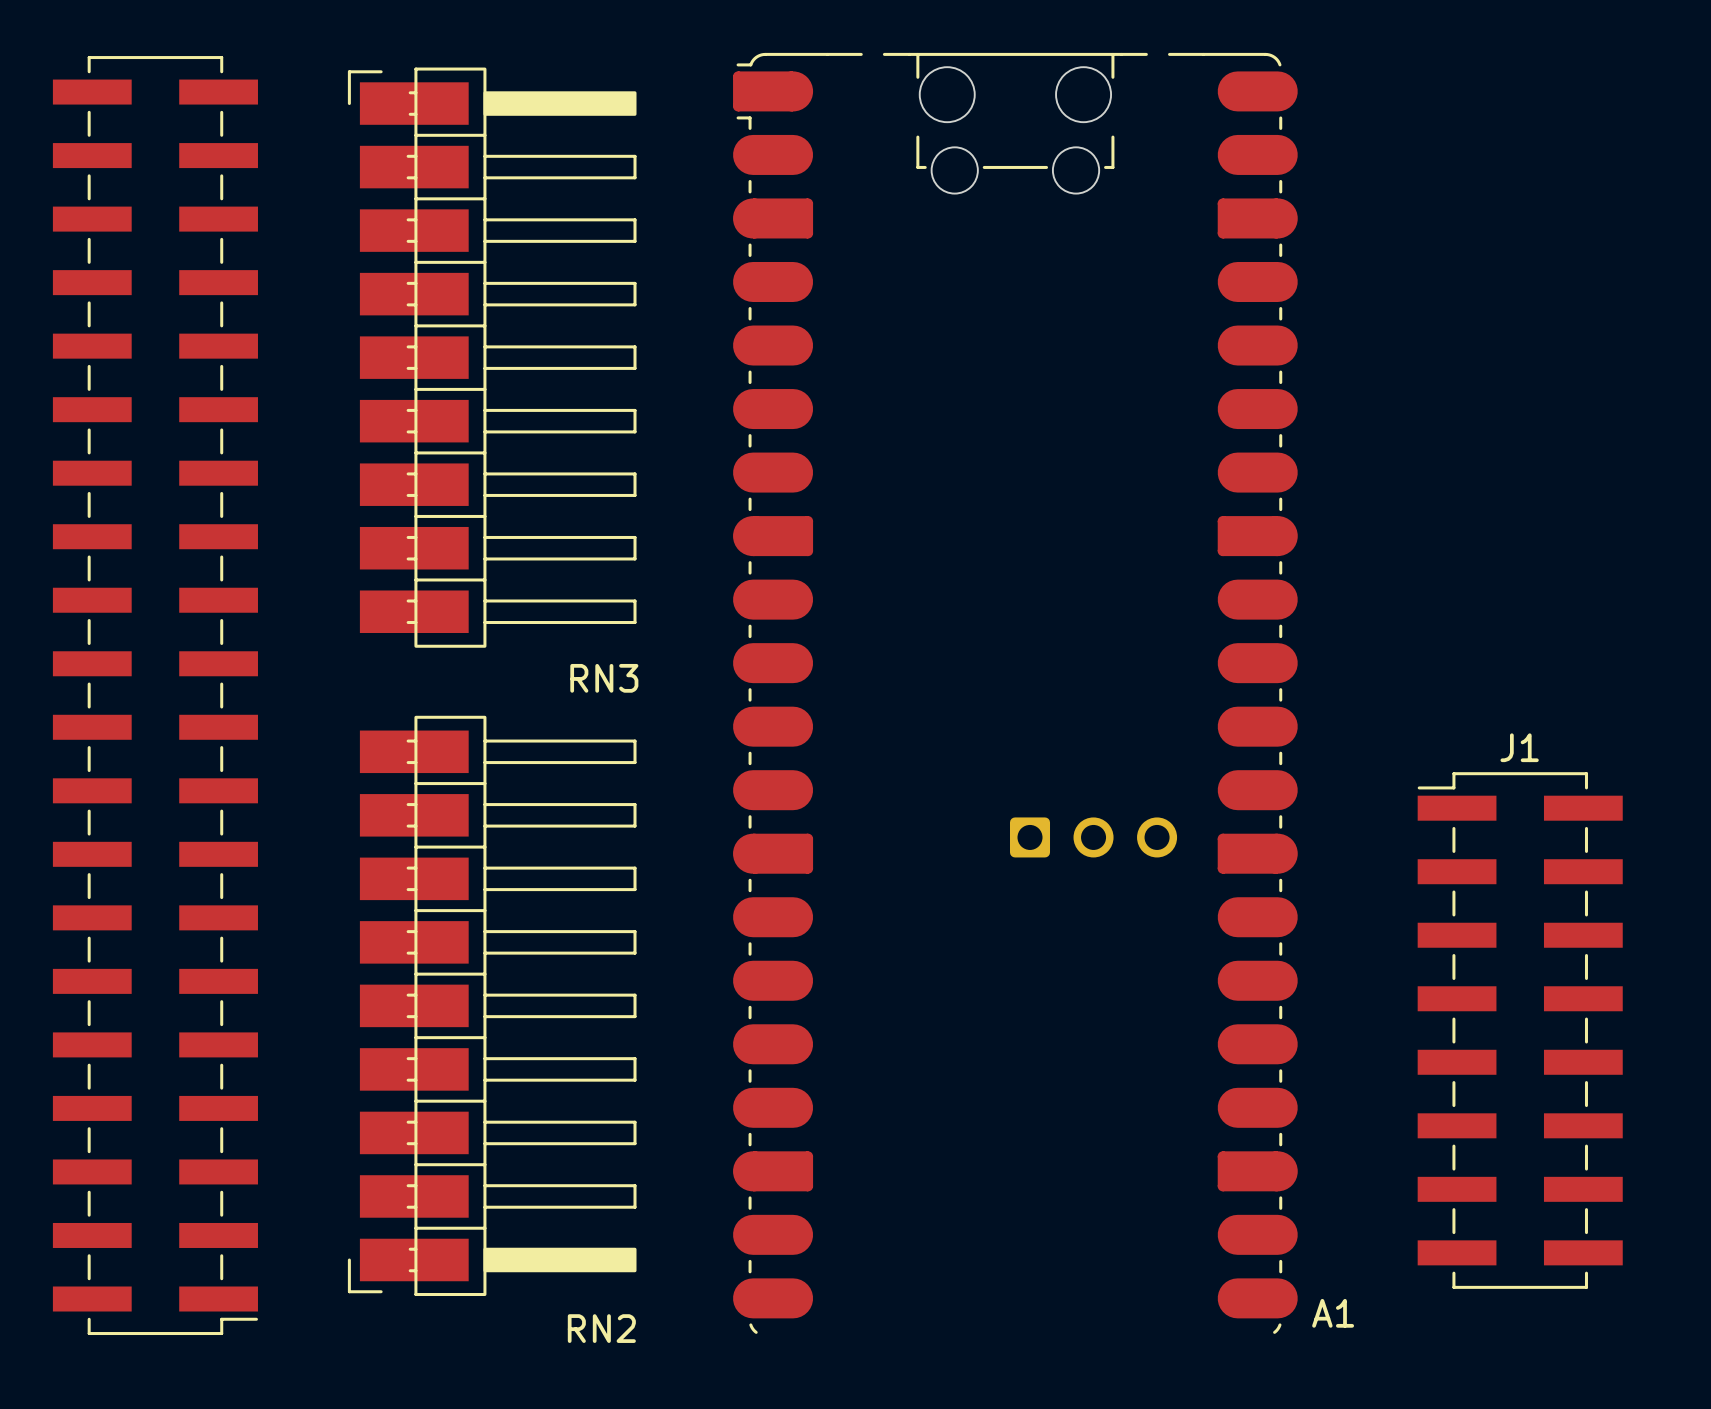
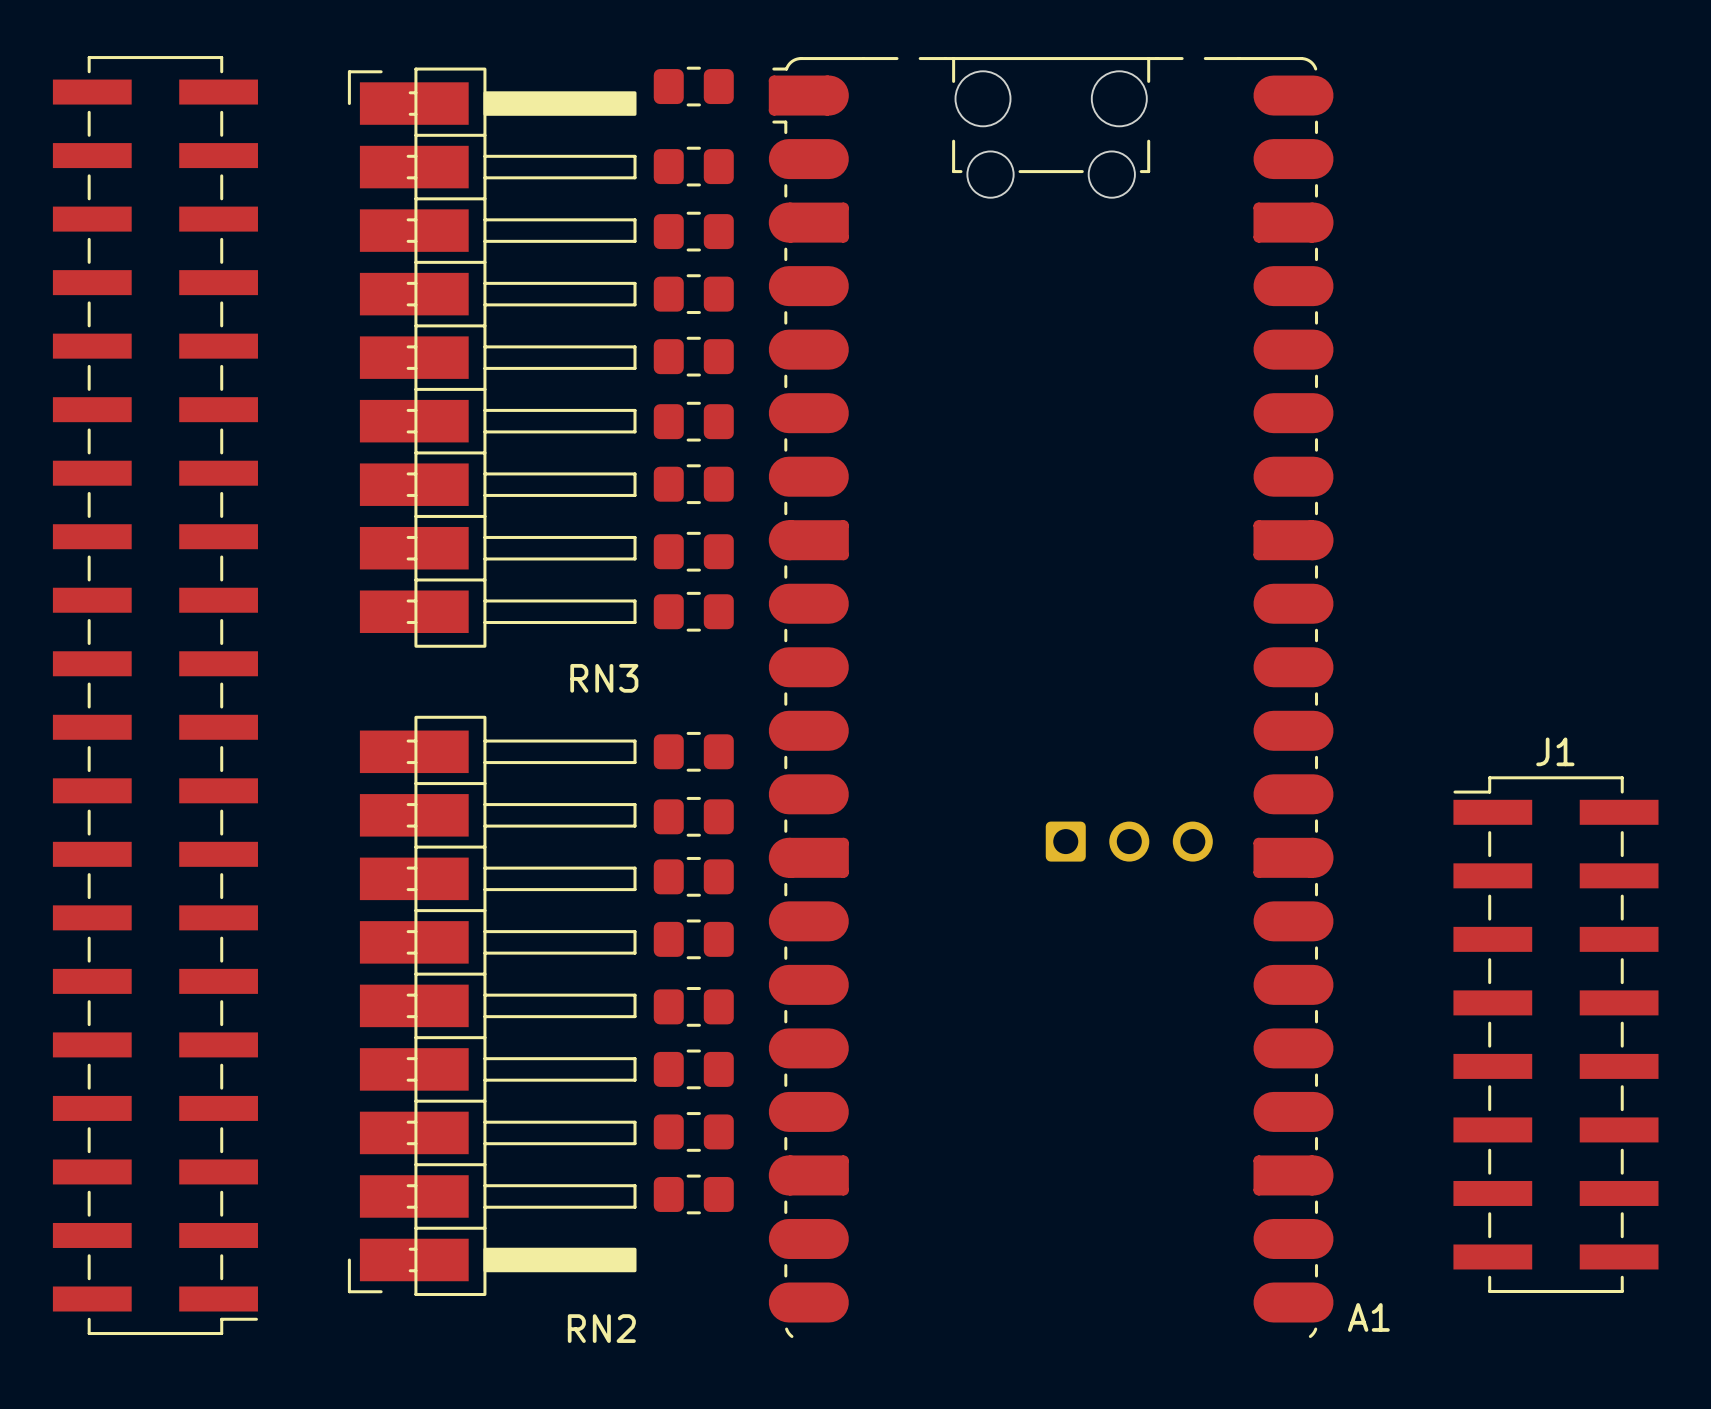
part: none -> (693, 86)
part: none -> (693, 166)
part: none -> (693, 231)
part: none -> (693, 294)
part: none -> (693, 356)
part: none -> (693, 421)
part: none -> (693, 484)
part: none -> (693, 551)
part: none -> (693, 611)
A1 position: (1015, 693) -> (1051, 697)
part: none -> (693, 751)
part: none -> (693, 816)
part: none -> (693, 876)
part: none -> (693, 939)
part: none -> (693, 1006)
J1 position: (1520, 1030) -> (1555, 1034)
part: none -> (693, 1069)
part: none -> (693, 1131)
part: none -> (693, 1194)

